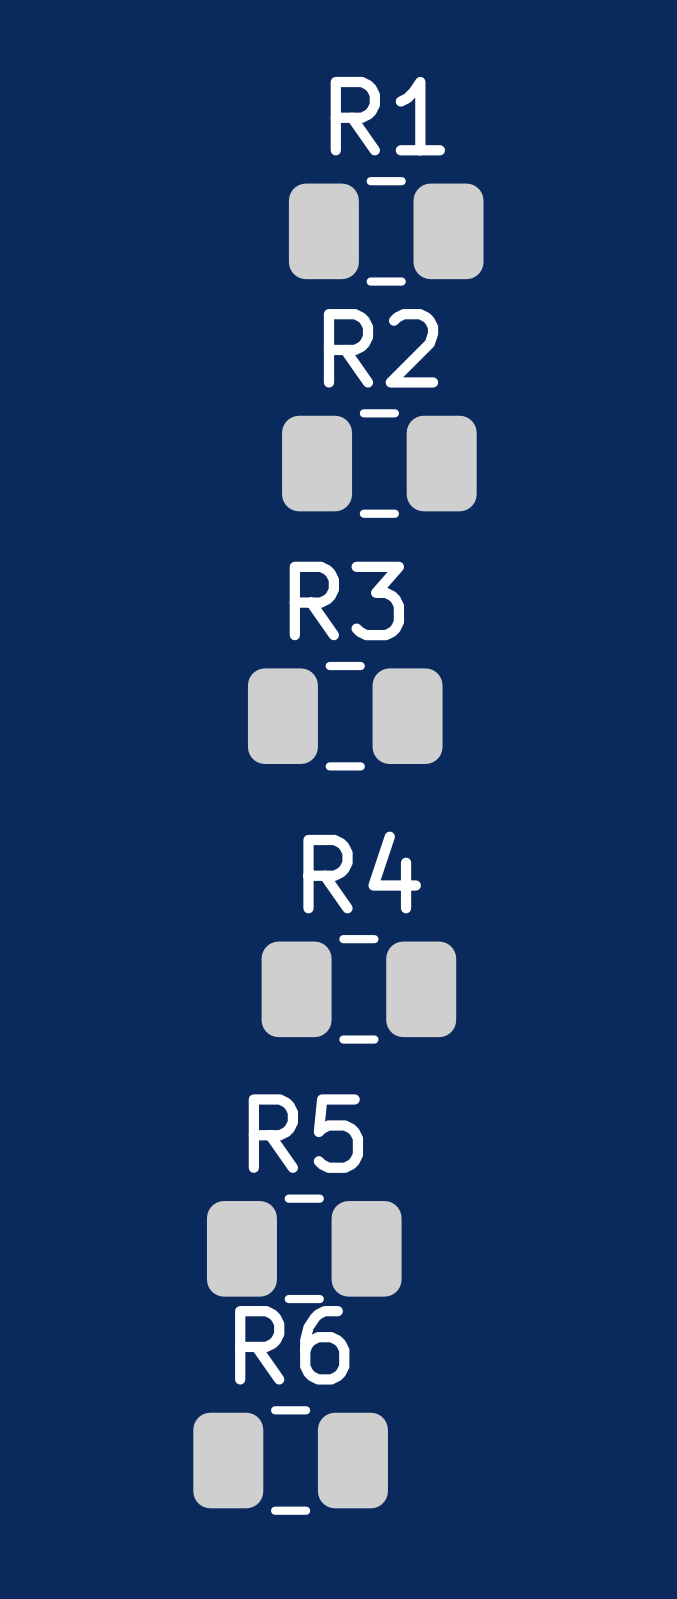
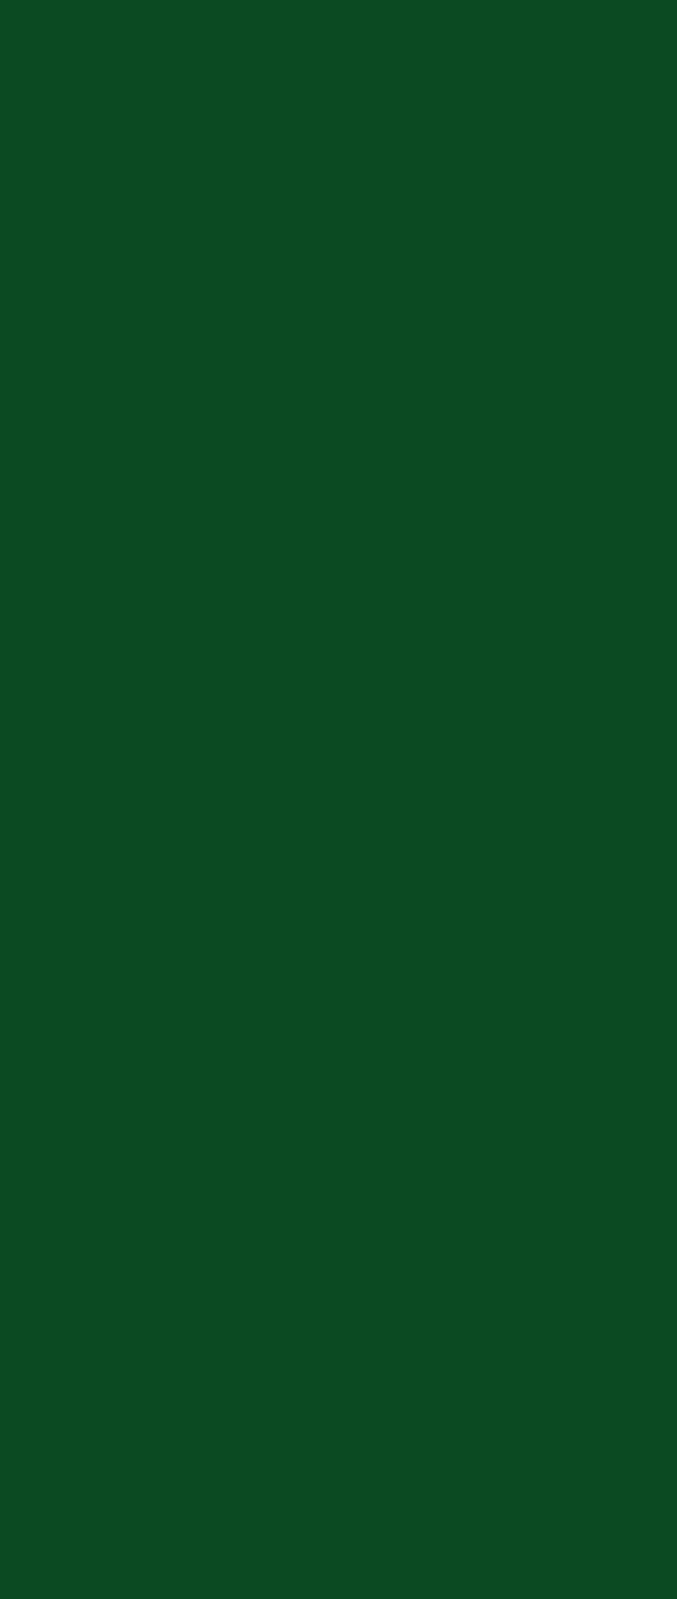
R1: (386, 231) -> none
R2: (379, 463) -> none
R3: (345, 716) -> none
R4: (358, 989) -> none
R5: (304, 1248) -> none
R6: (290, 1460) -> none

